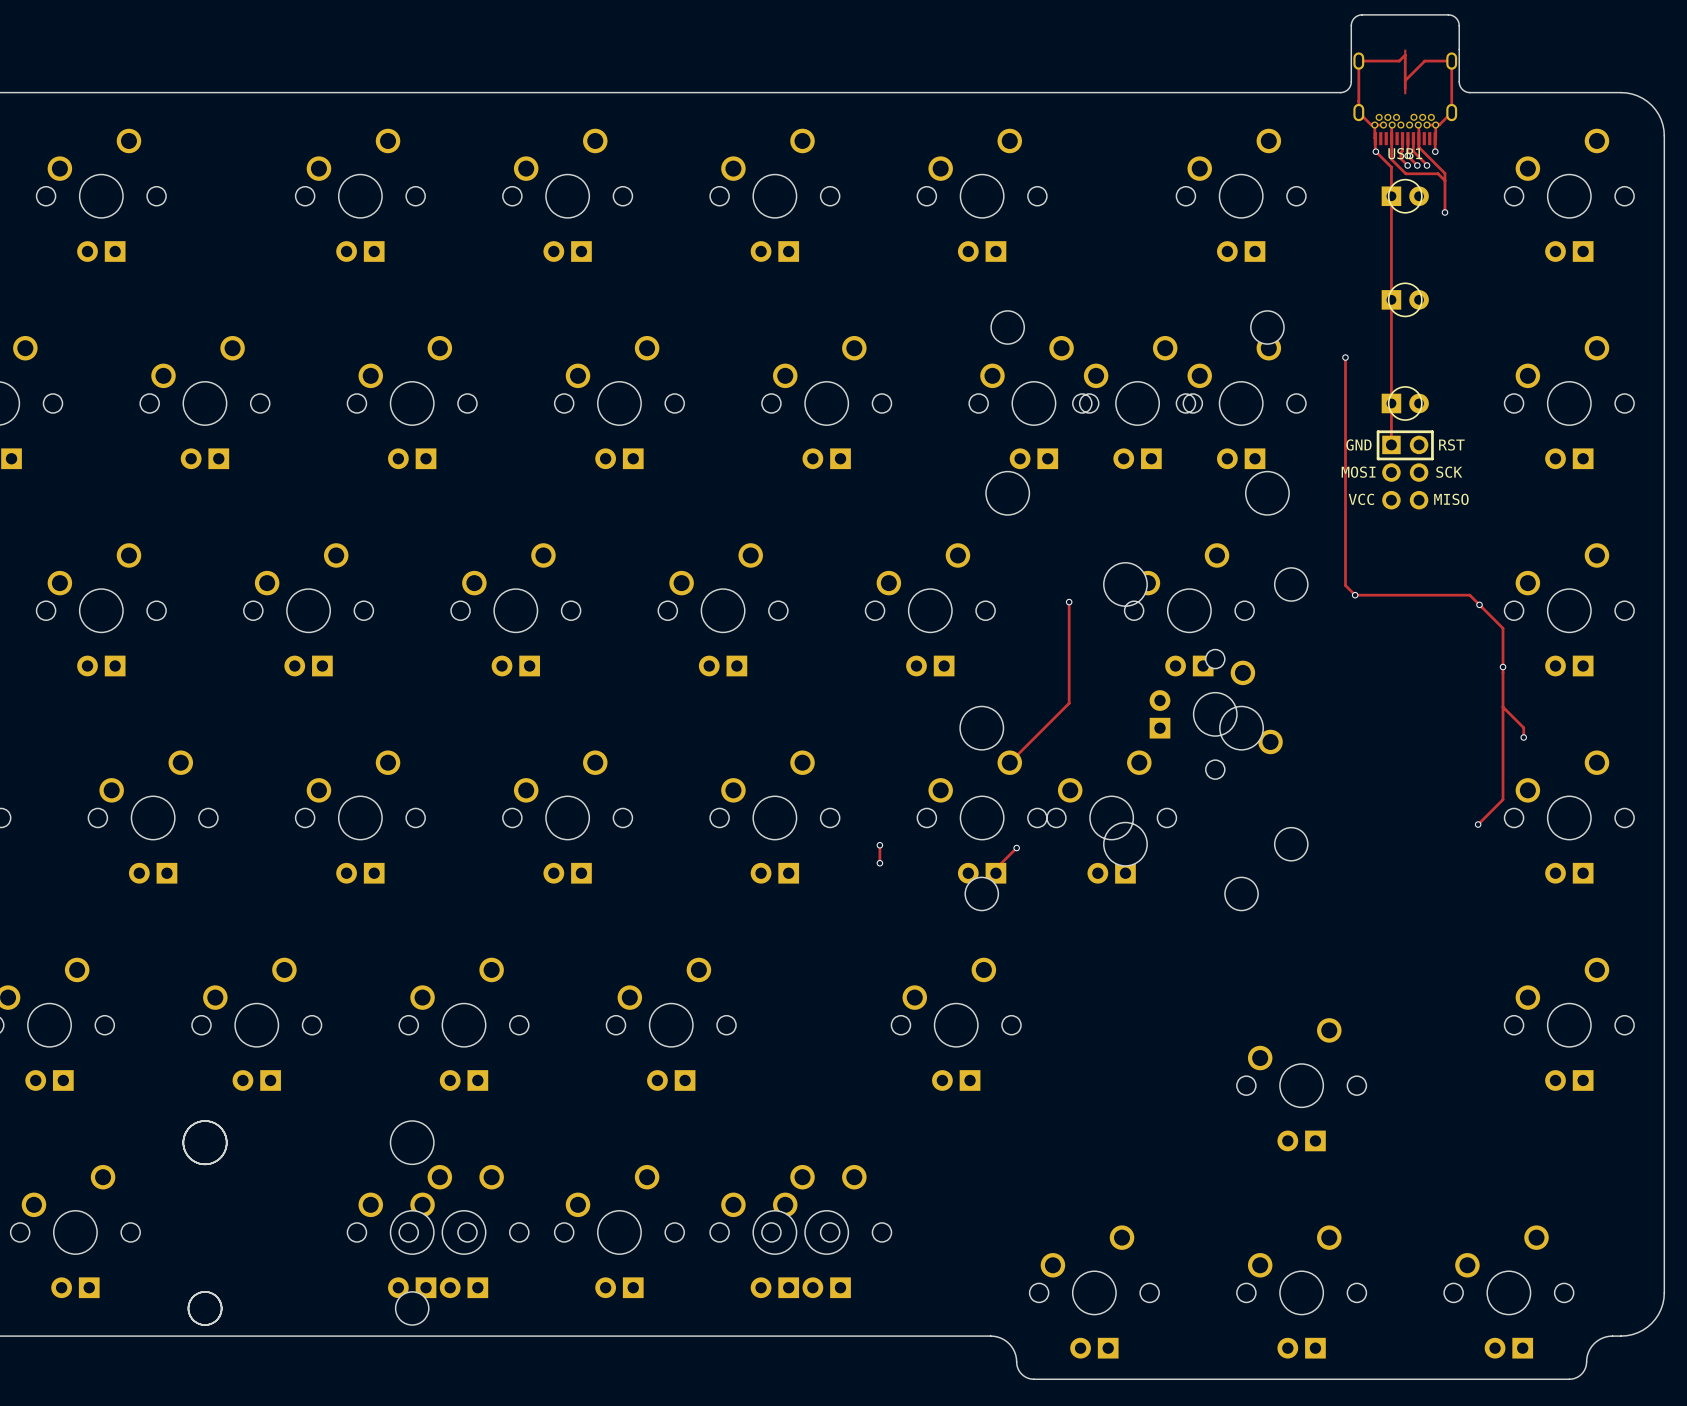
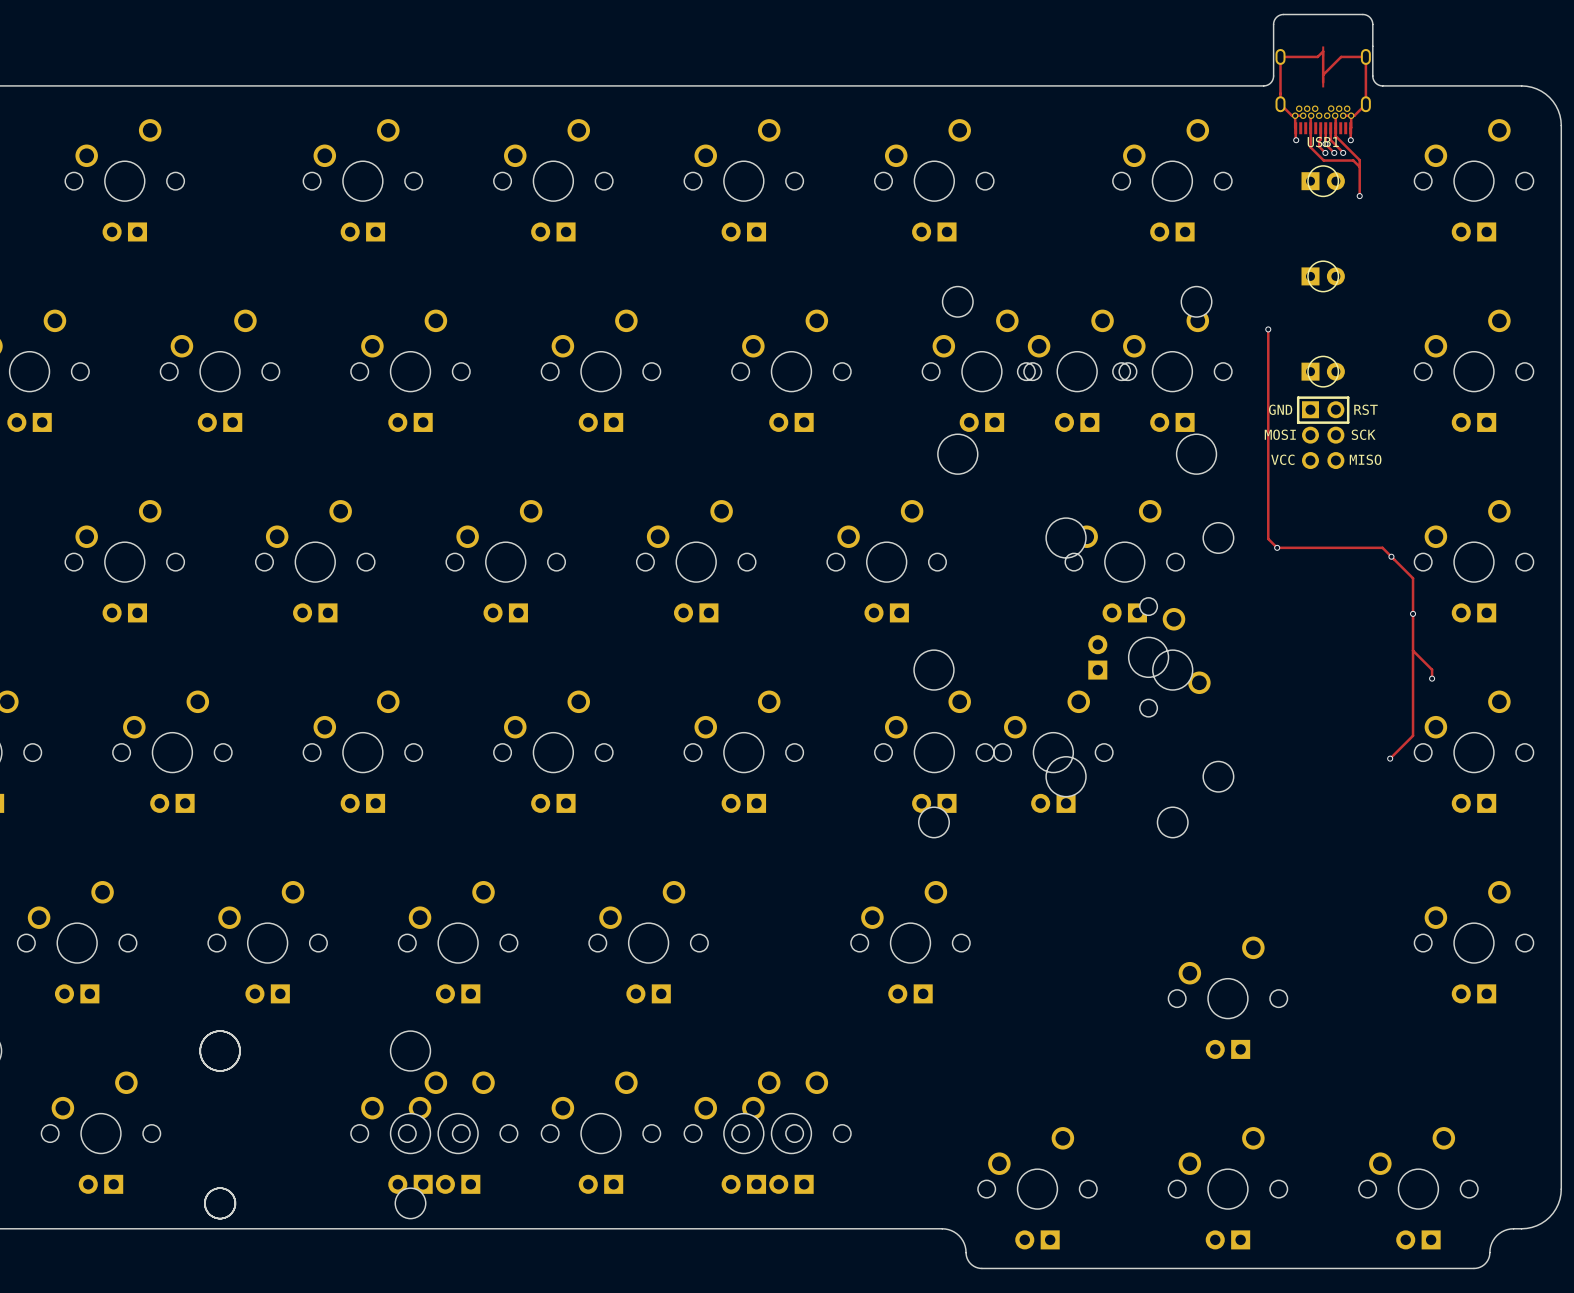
track: (1375, 151) (1391, 167) (1391, 444) -> none
track: (1069, 602) (1069, 703) (1009, 762) -> none
via: (1069, 602) -> none
track: (879, 845) (879, 863) -> none
via: (879, 845) -> none
track: (1016, 848) (995, 868) (995, 873) -> none
via: (1016, 848) -> none
via: (879, 863) -> none

